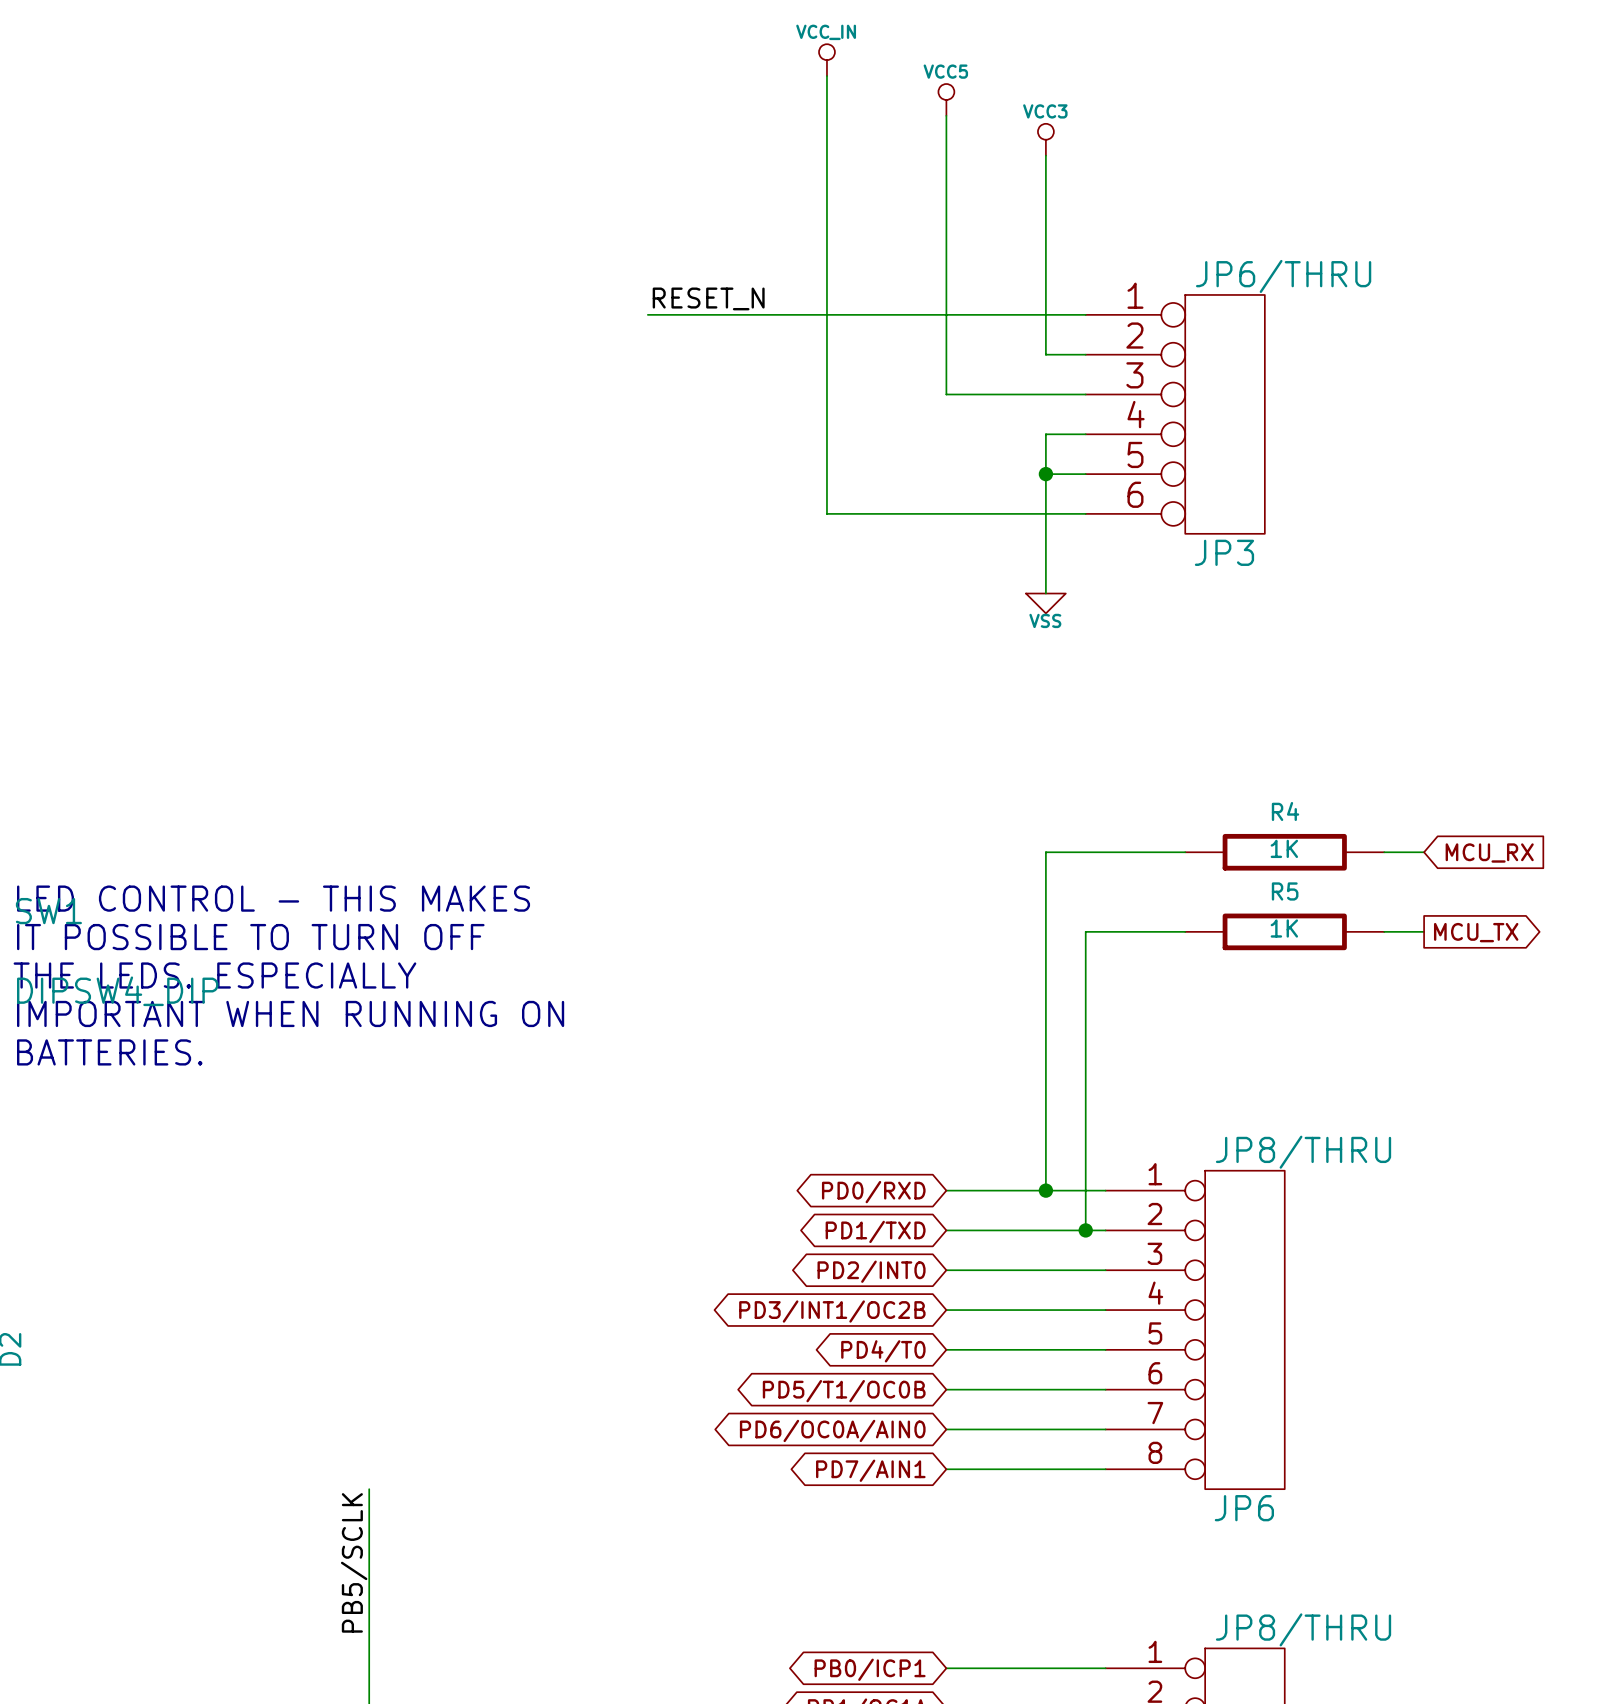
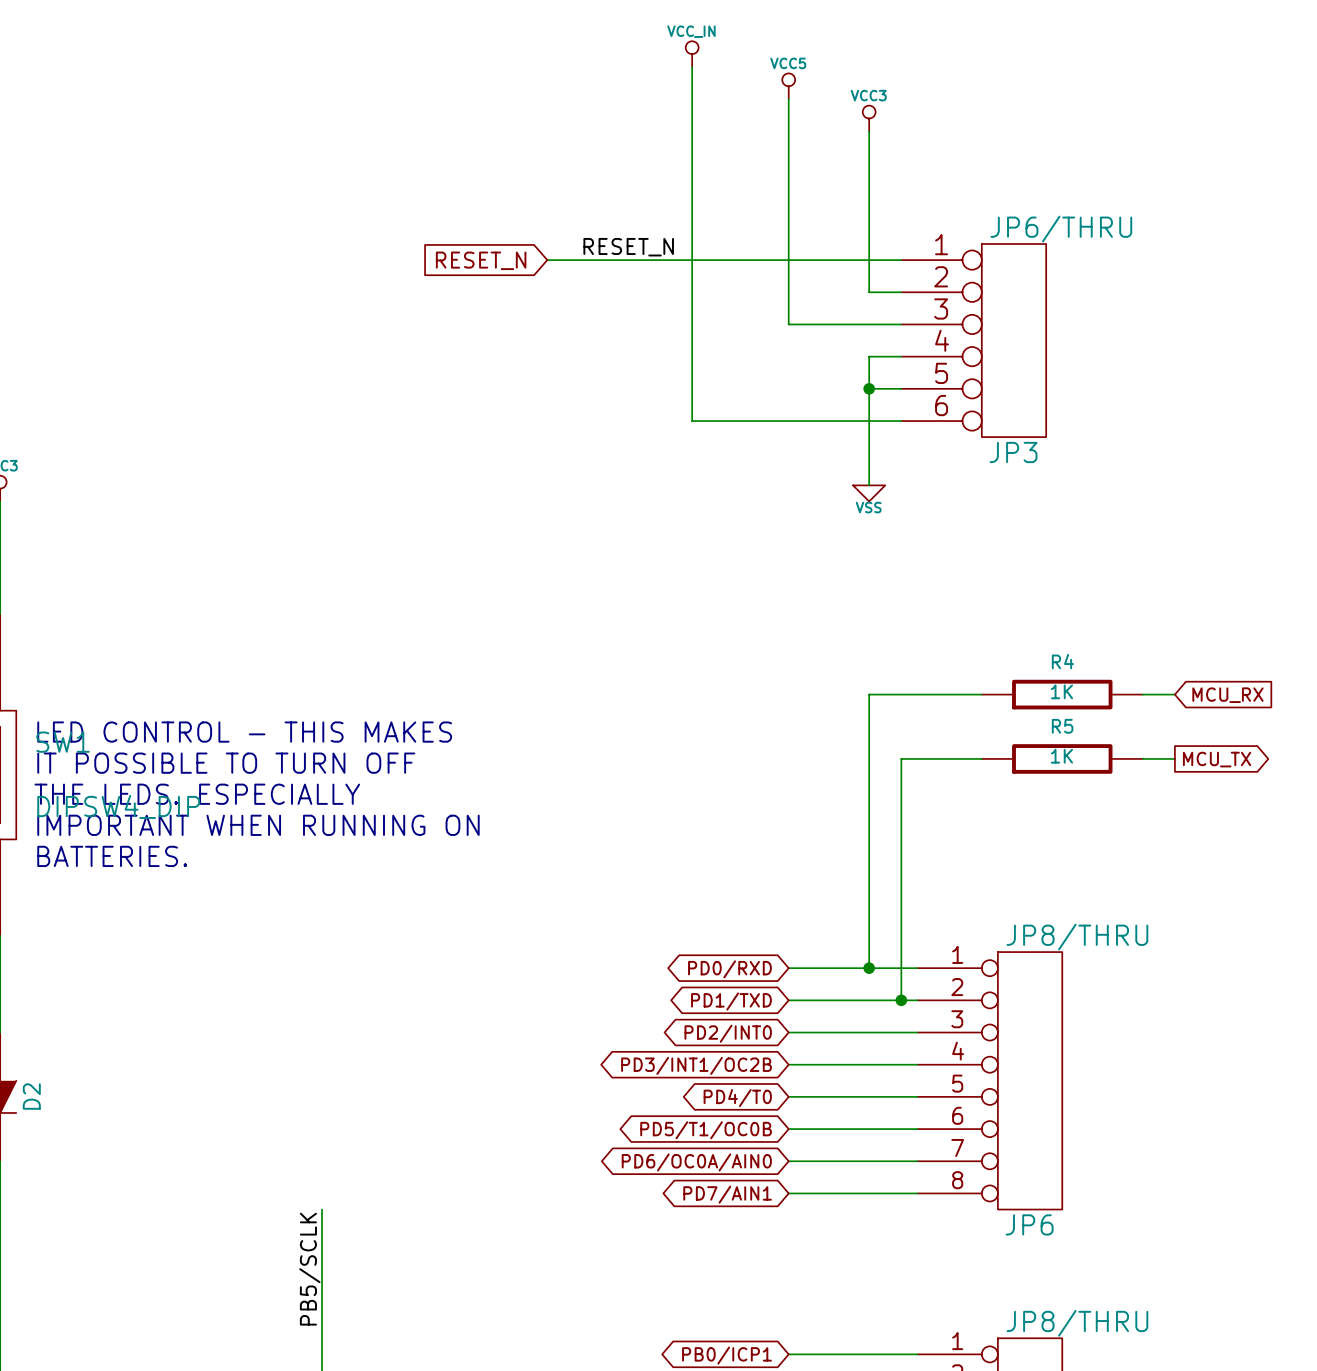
label position: RESET_N (708, 298) -> RESET_N (628, 247)
global label: none -> RESET_N (481, 260)

